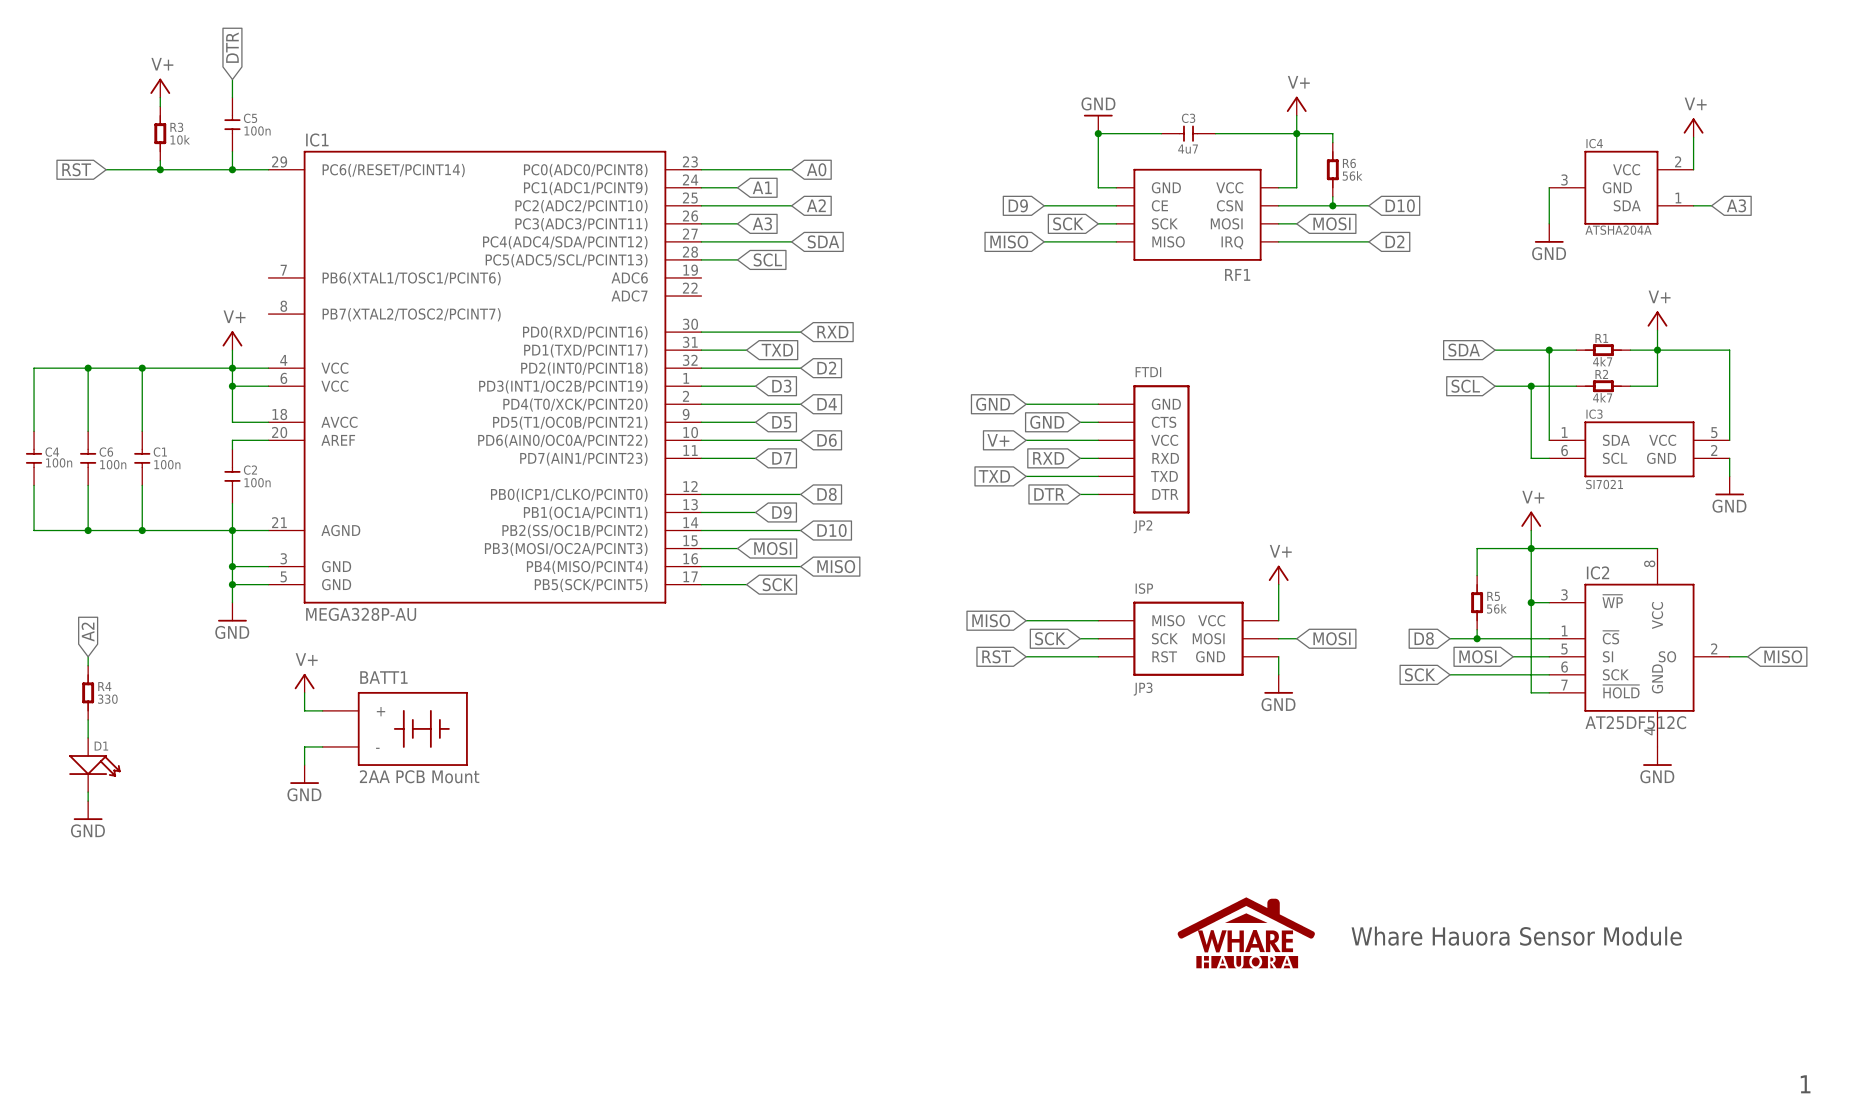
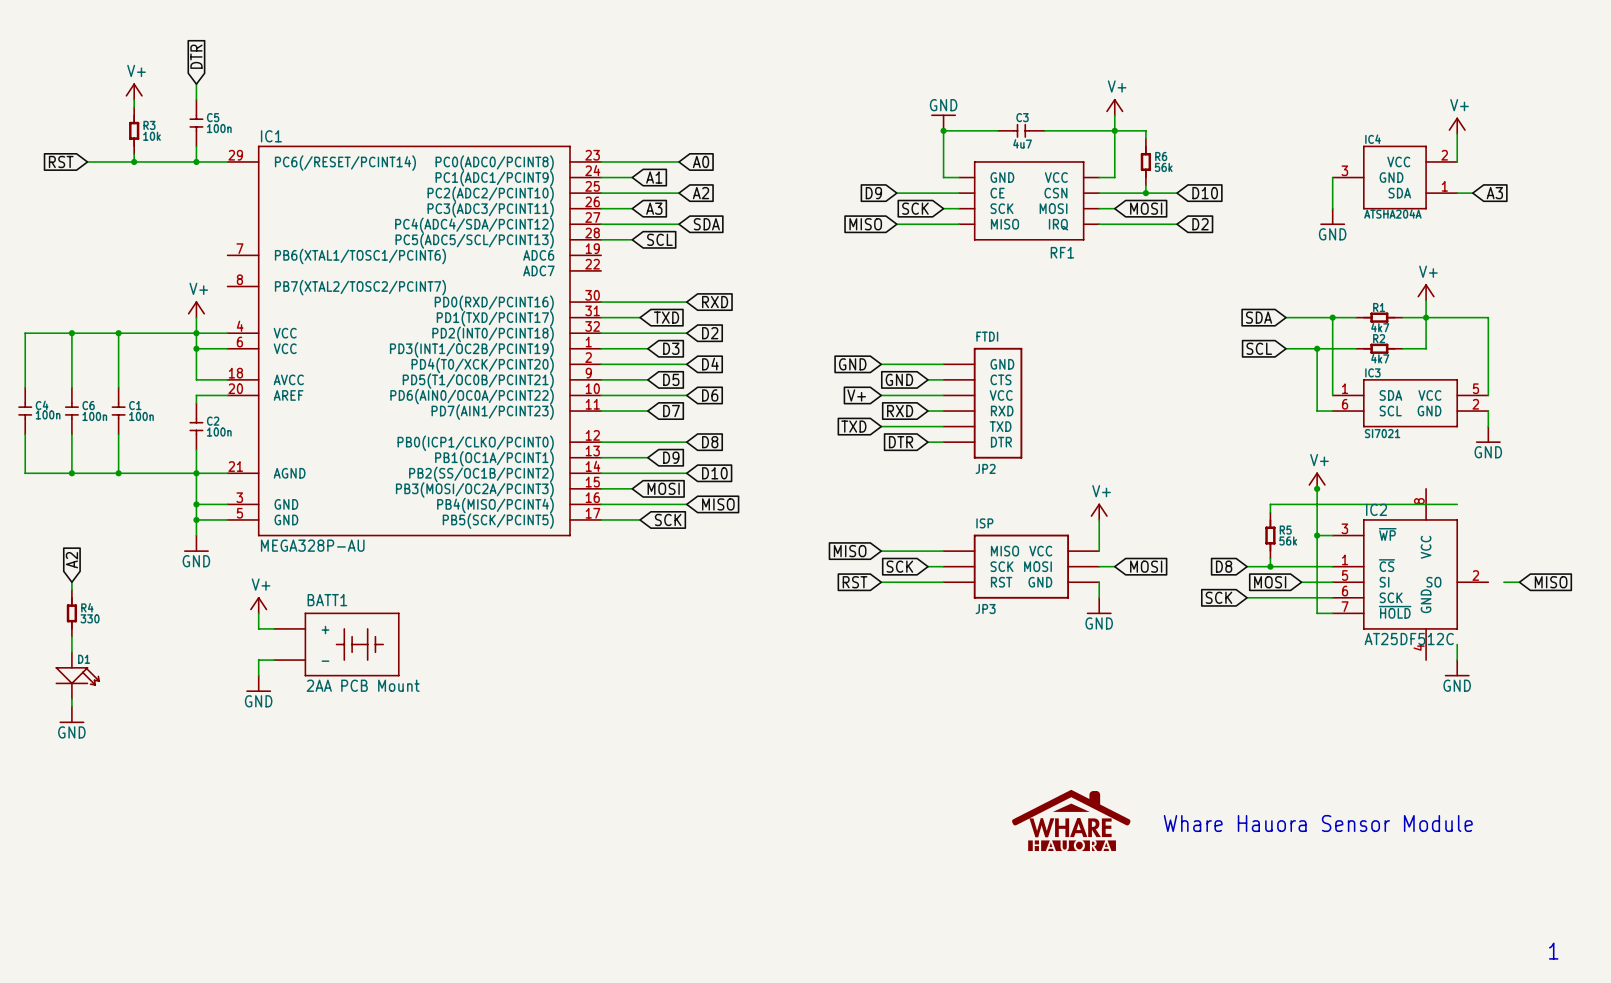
power symbol position: V+ (1531, 521) -> V+ (1317, 480)
wire: (1657, 548) (1477, 548) (1477, 566) -> (1457, 504) (1270, 504)
wire: (1729, 656) (1747, 656) -> (1519, 582) (1503, 582)
global label position: MISO (1783, 656) -> MISO (1551, 582)
wire: none -> (1457, 644) (1457, 660)
power symbol position: GND (1657, 756) -> GND (1457, 668)

